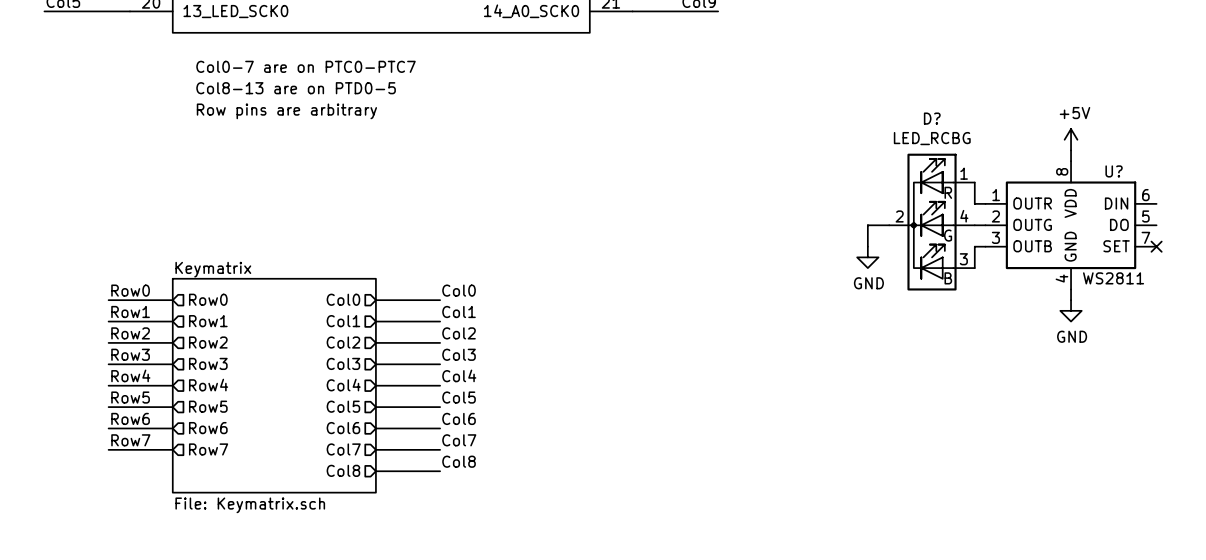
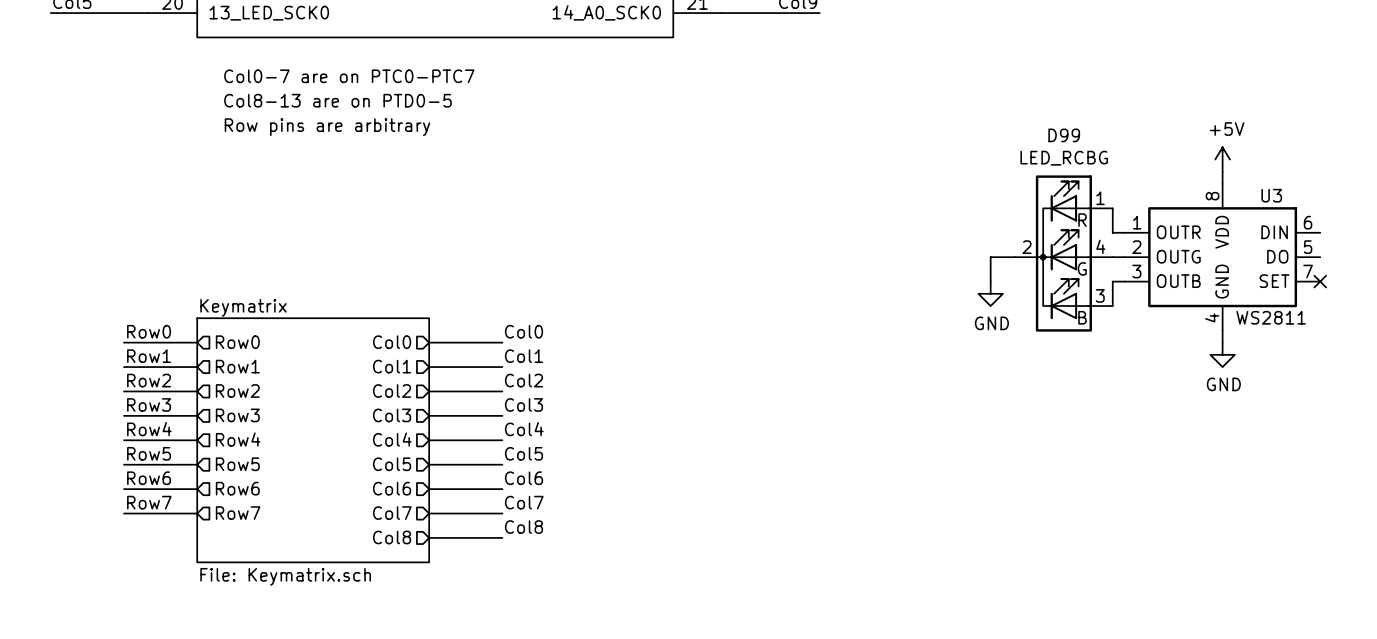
D? name: D? (932, 118) -> D99 (1064, 135)
U? name: U? (1114, 171) -> U3 (1271, 195)

